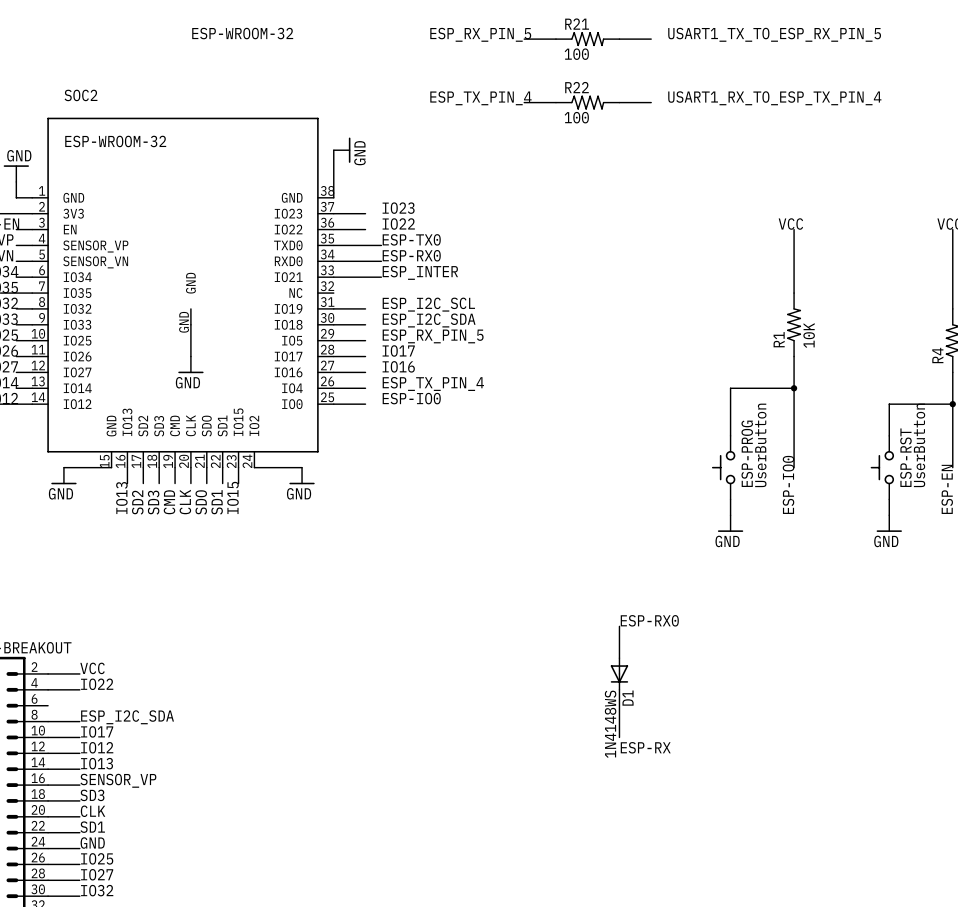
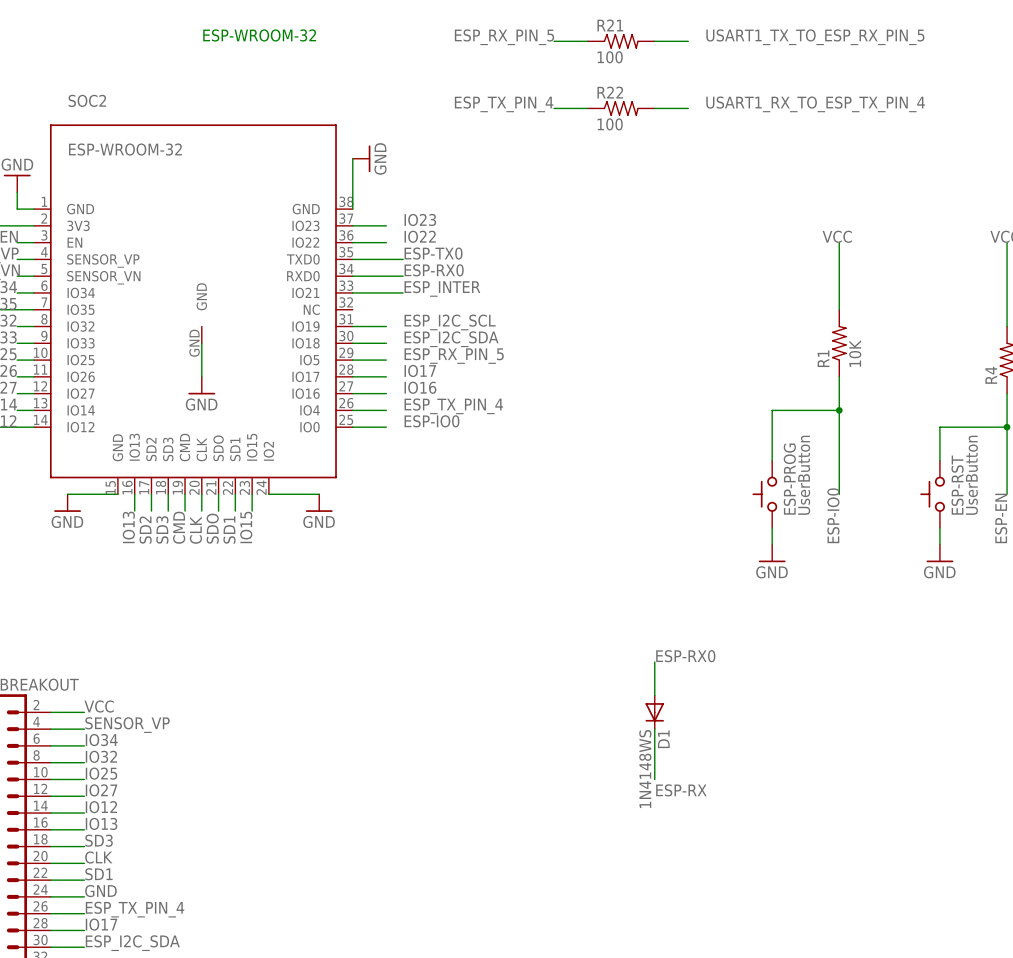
label: IO22 (97, 684) -> SENSOR_VP (127, 725)
label: none -> IO34 (101, 740)
wire: none -> (50, 745) (84, 745)
label: ESP_I2C_SDA (127, 717) -> IO32 (101, 756)
label: IO17 (97, 731) -> IO25 (101, 773)
label: IO12 (97, 747) -> IO27 (101, 790)
label: IO13 (97, 763) -> IO12 (101, 807)
label: SENSOR_VP (118, 780) -> IO13 (101, 823)
label: IO25 (97, 858) -> ESP_TX_PIN_4 (135, 909)
label: IO27 (97, 874) -> IO17 (101, 924)
label: IO32 (97, 890) -> ESP_I2C_SDA (132, 943)

